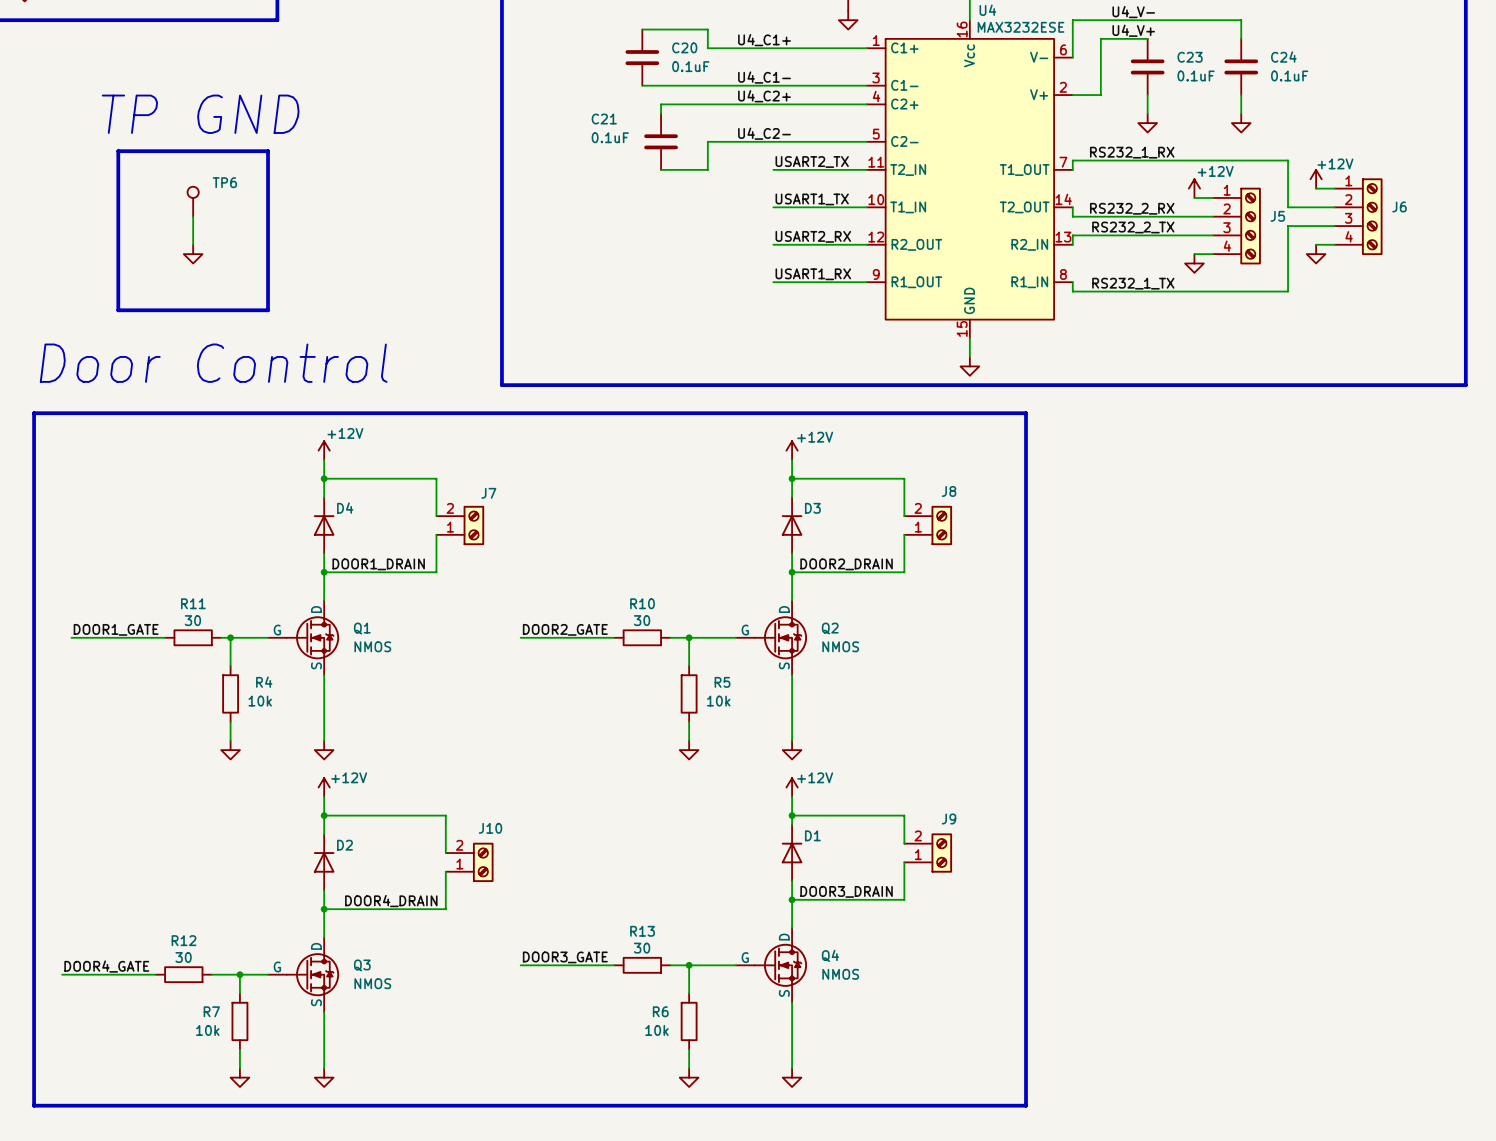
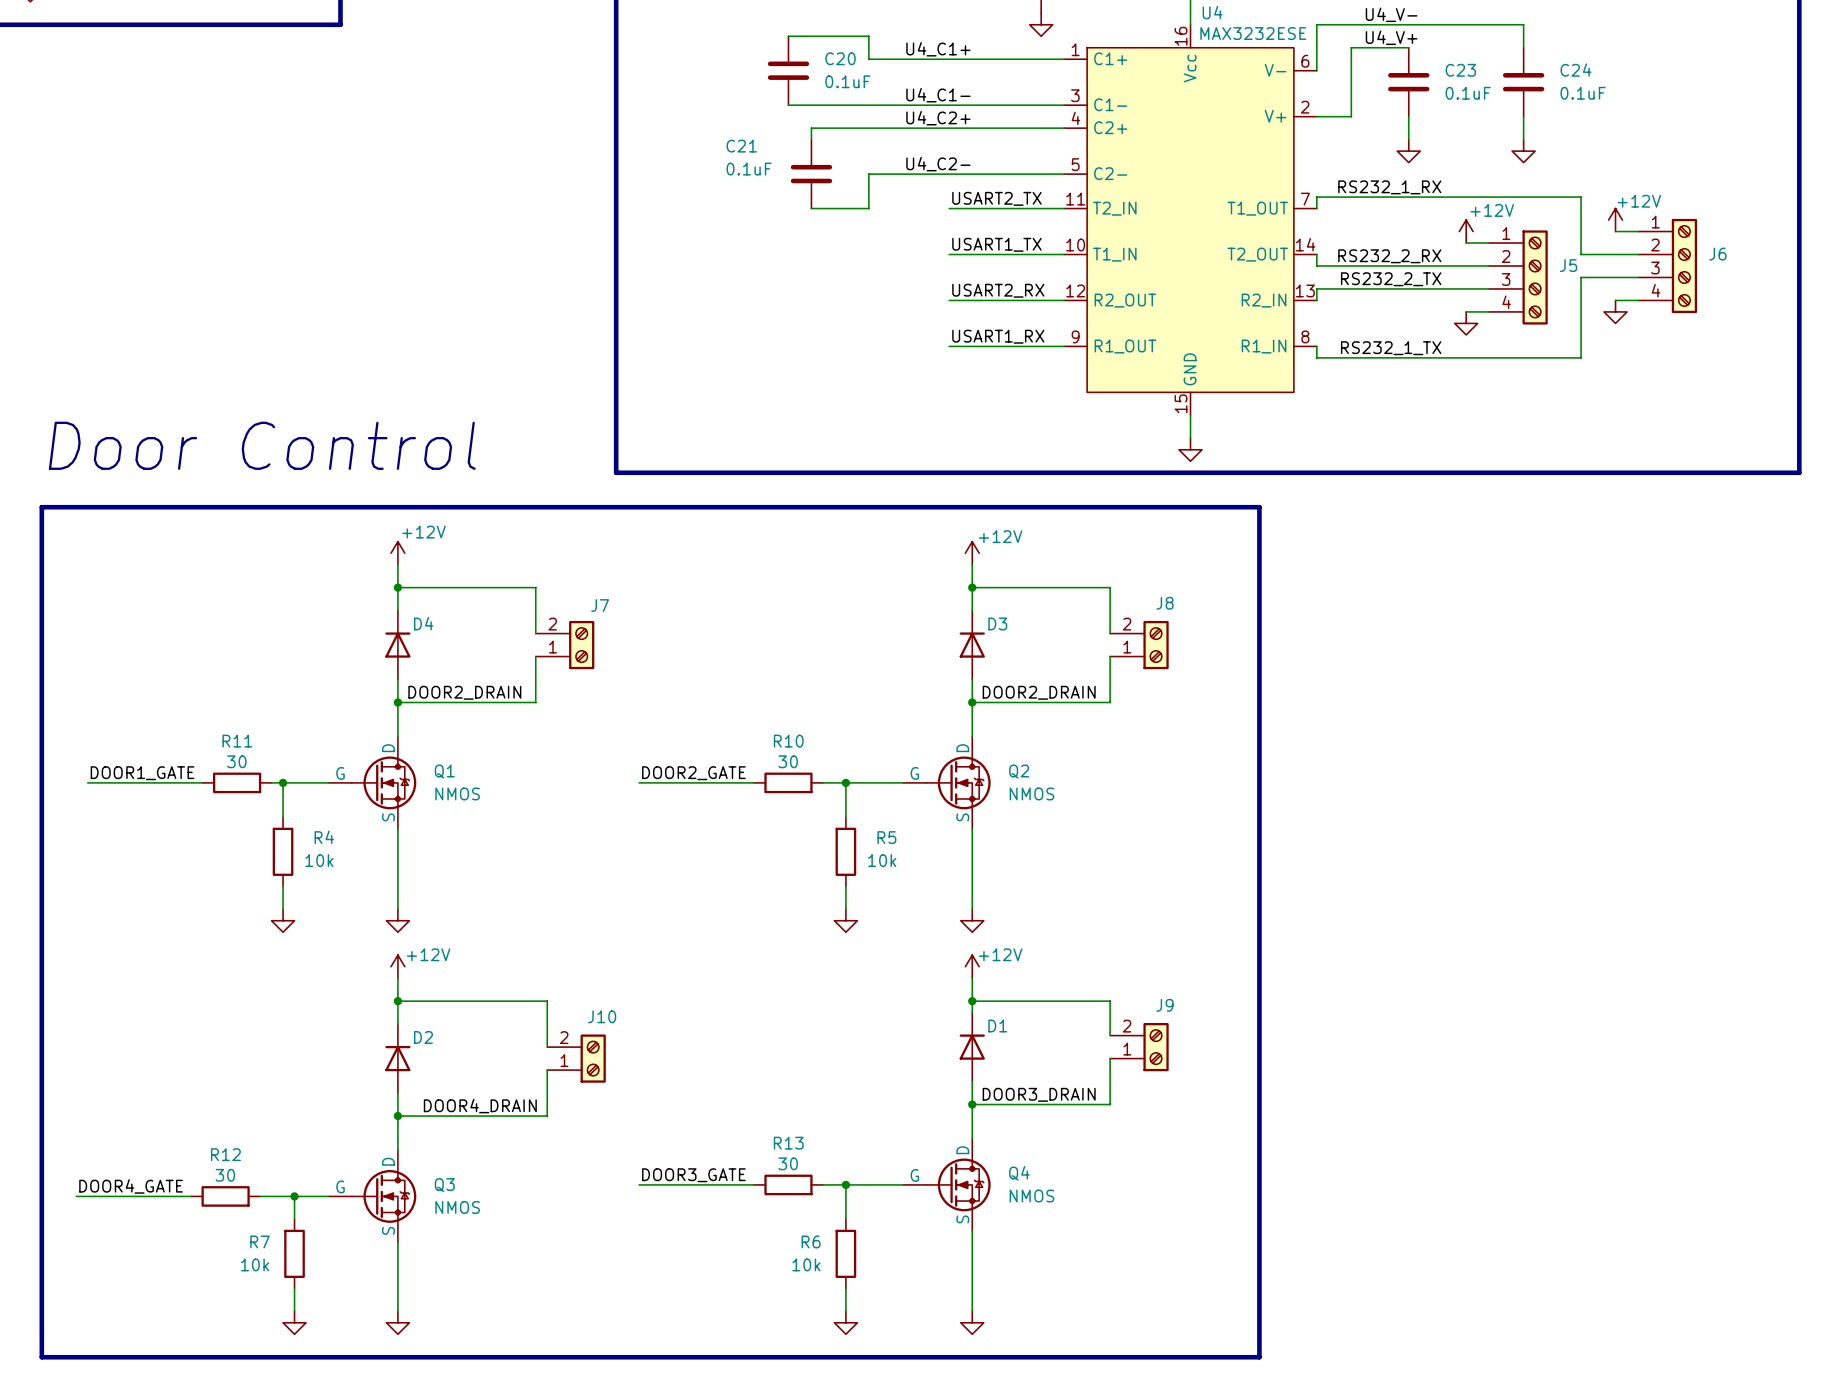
text: TP GND (200, 114) -> none
line: (118, 151) (268, 151) (268, 310) (118, 310) (118, 151) -> none
TP6: (193, 201) -> none
wire: (193, 216) (193, 244) -> none
power symbol: (193, 254) -> none
label: DOOR1_DRAIN (378, 564) -> DOOR2_DRAIN (464, 692)

